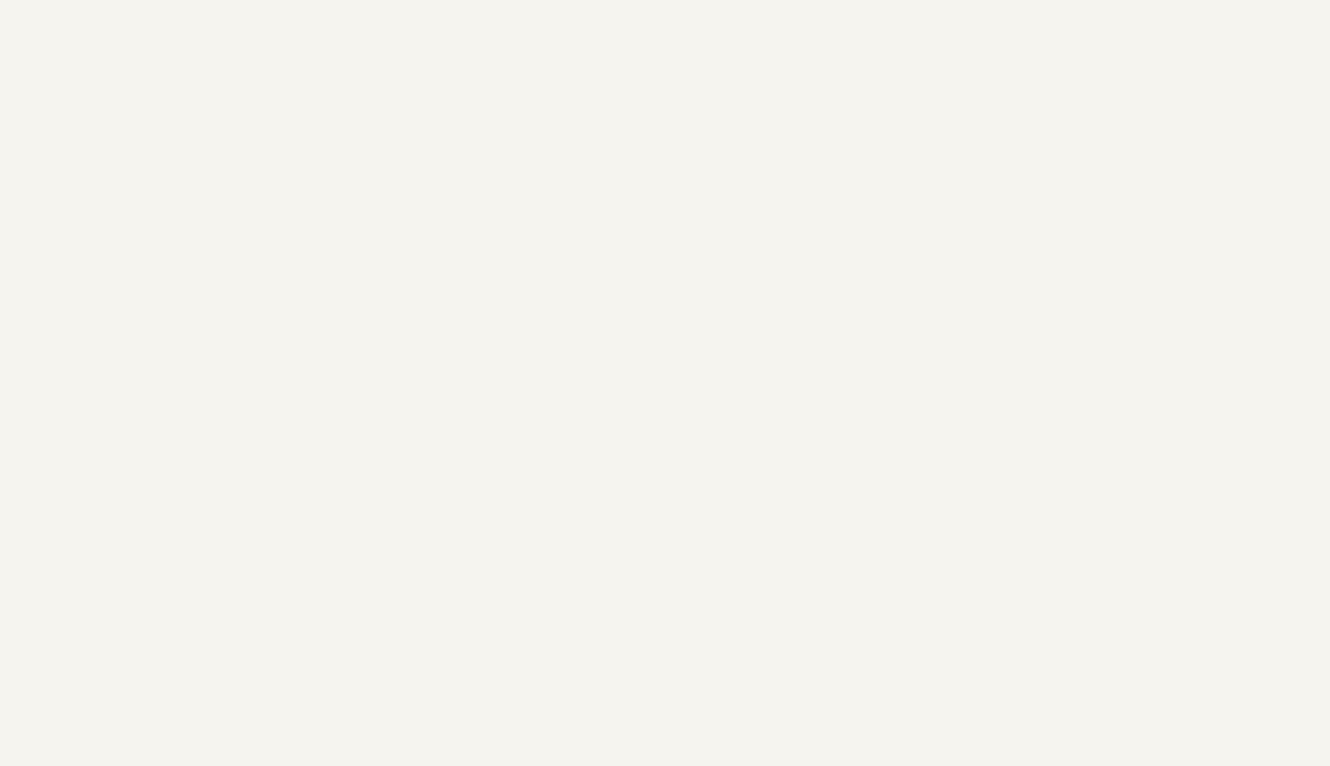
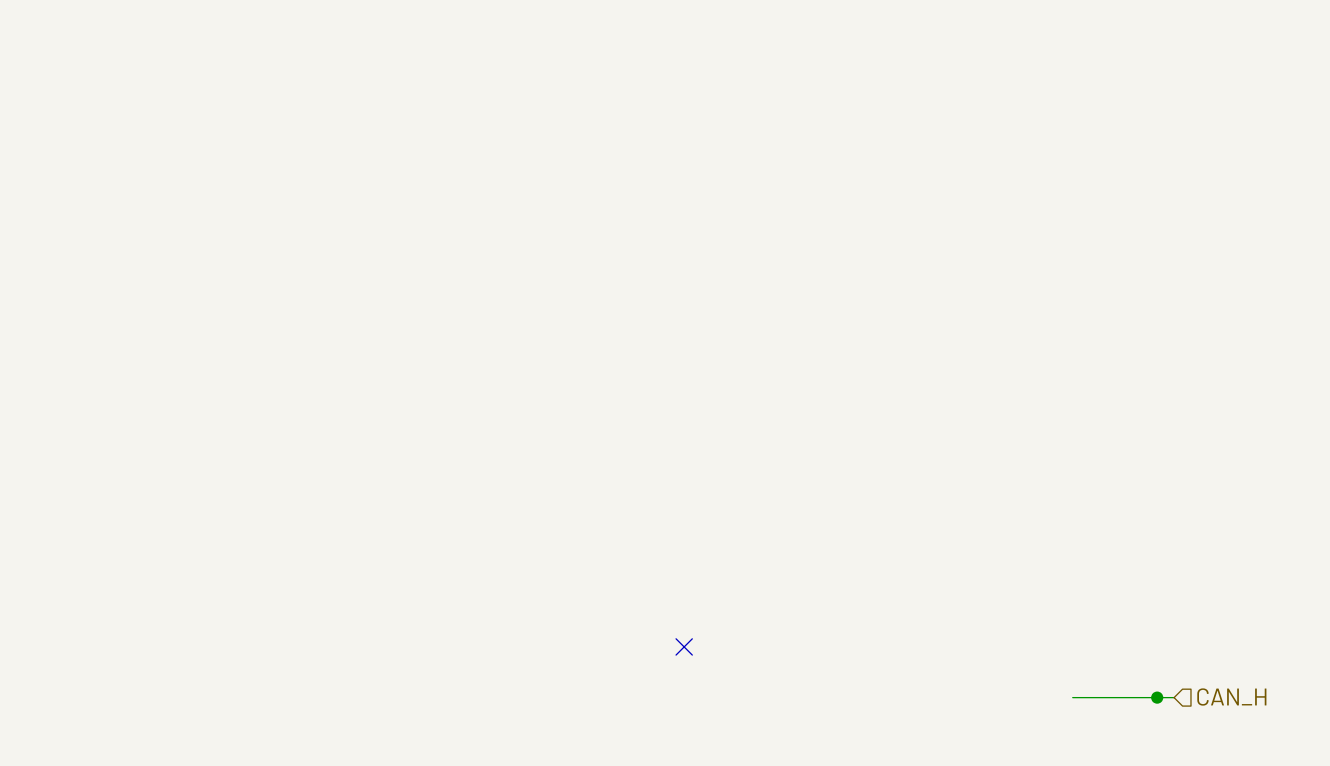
no-connect mark: none -> (684, 646)
wire: none -> (1072, 697) (1174, 697)
junction: none -> (1157, 697)
hierarchical label: none -> CAN_H (1231, 697)

